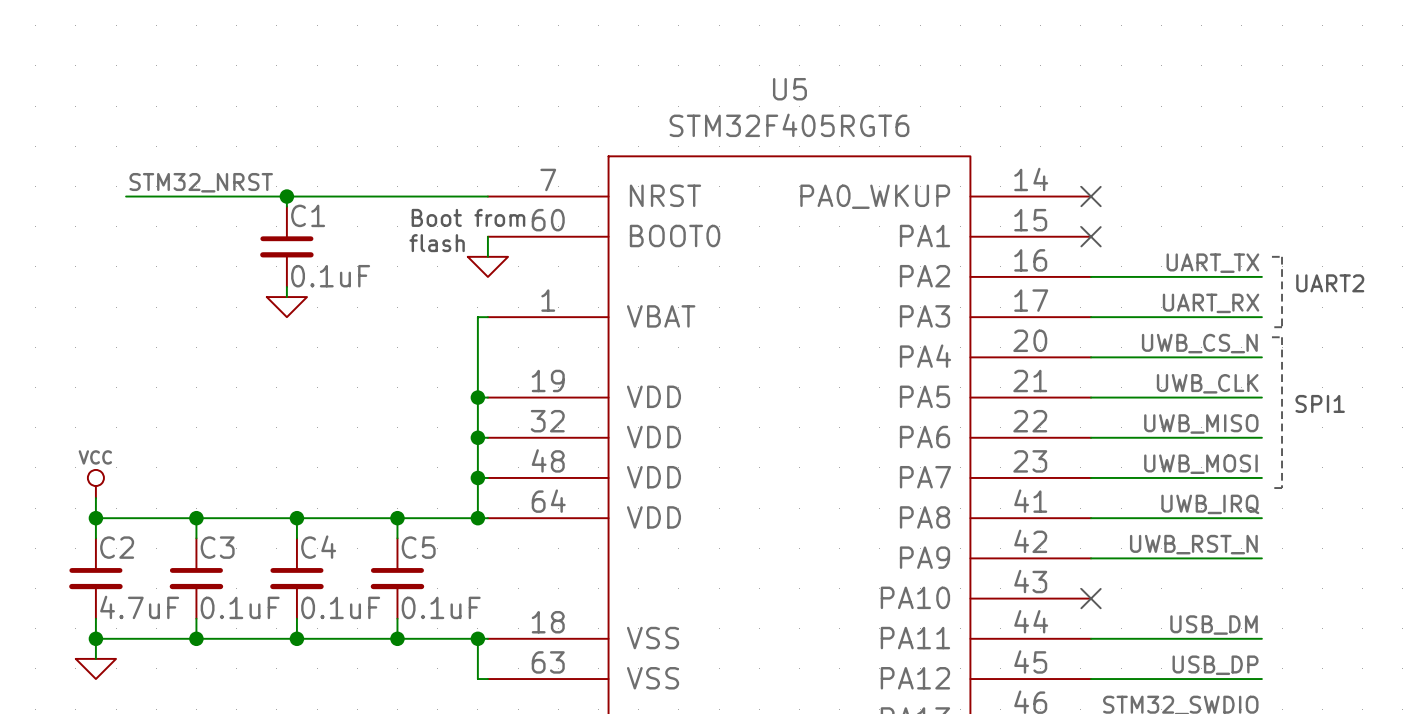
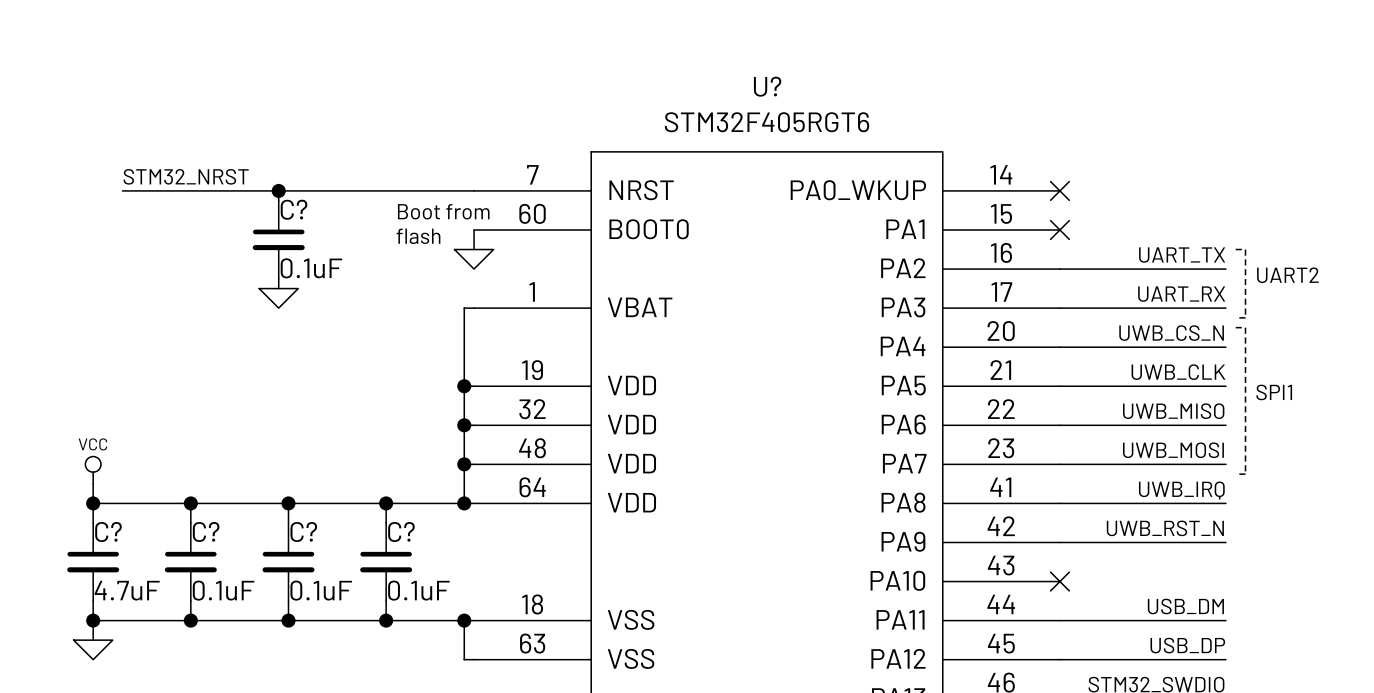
U5 name: U5 (789, 89) -> U? (767, 86)
C1 name: C1 (308, 215) -> C? (294, 209)
C2 name: C2 (117, 547) -> C? (108, 531)
C3 name: C3 (217, 547) -> C? (206, 531)
C4 name: C4 (318, 547) -> C? (303, 531)
C5 name: C5 (418, 547) -> C? (401, 531)

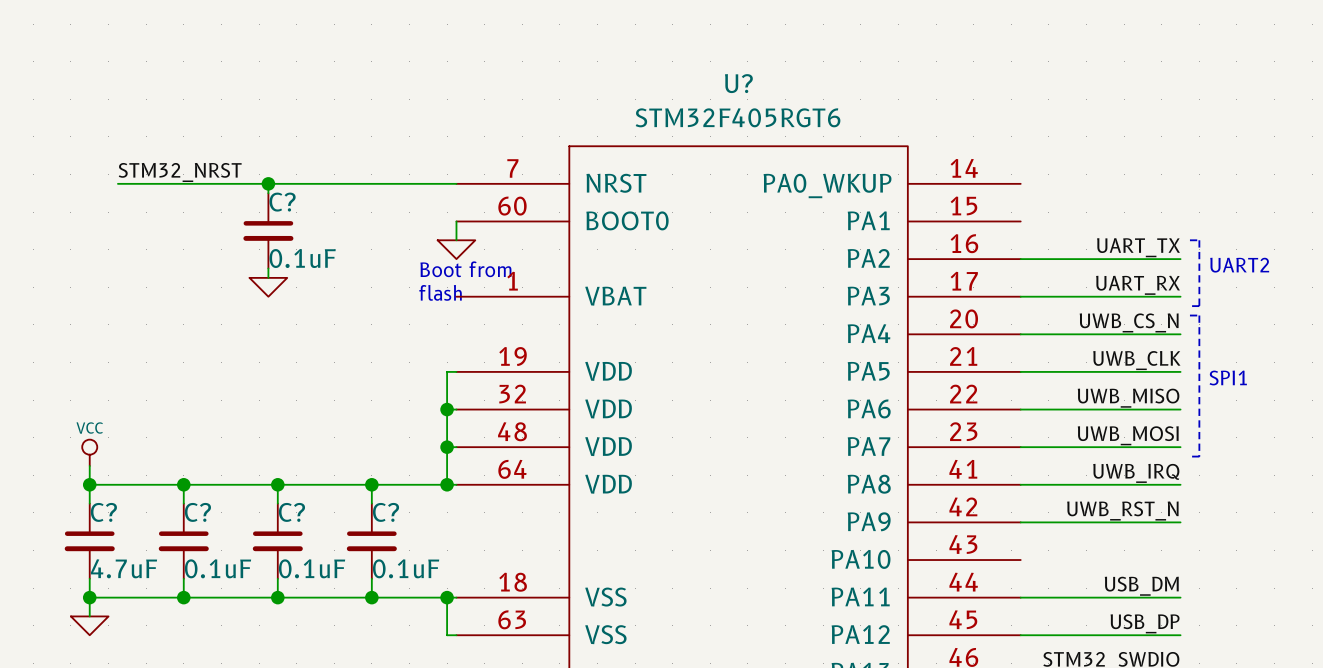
no-connect mark: (1059, 190) -> none
text position: Boot from (443, 211) -> Boot from (465, 269)
no-connect mark: (1059, 230) -> none
text position: flash (418, 236) -> flash (440, 292)
wire: (474, 308) (464, 308) (464, 386) -> none
junction: (464, 386) -> none
no-connect mark: (1059, 581) -> none

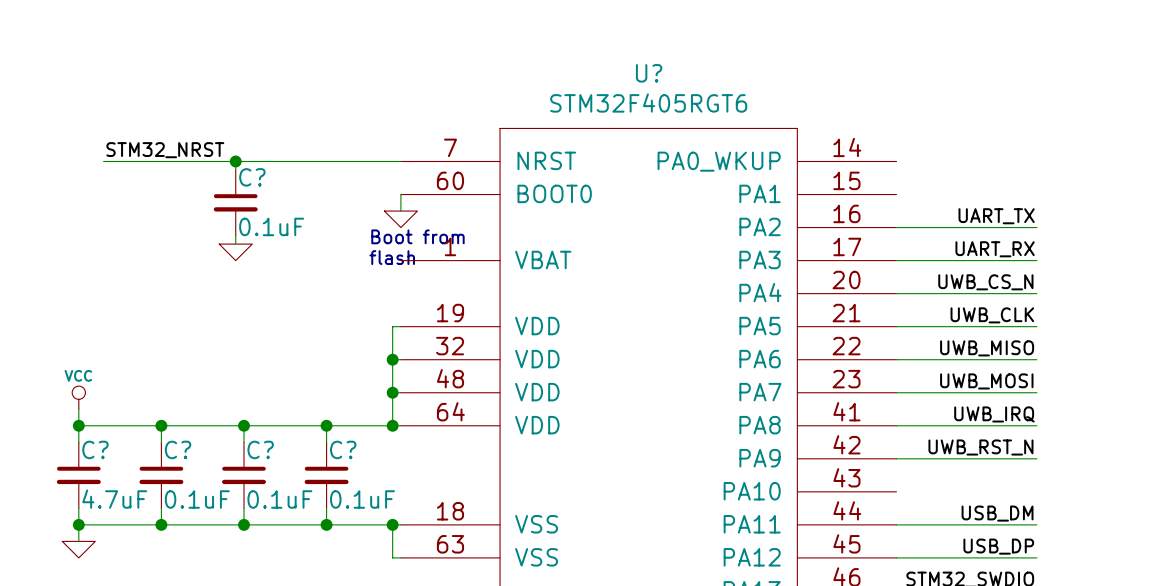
line: (1189, 240) (1199, 240) (1199, 306) (1189, 306) -> none
text: UART2 (1239, 265) -> none
line: (1189, 315) (1199, 315) (1199, 456) (1189, 456) -> none
text: SPI1 (1228, 377) -> none

